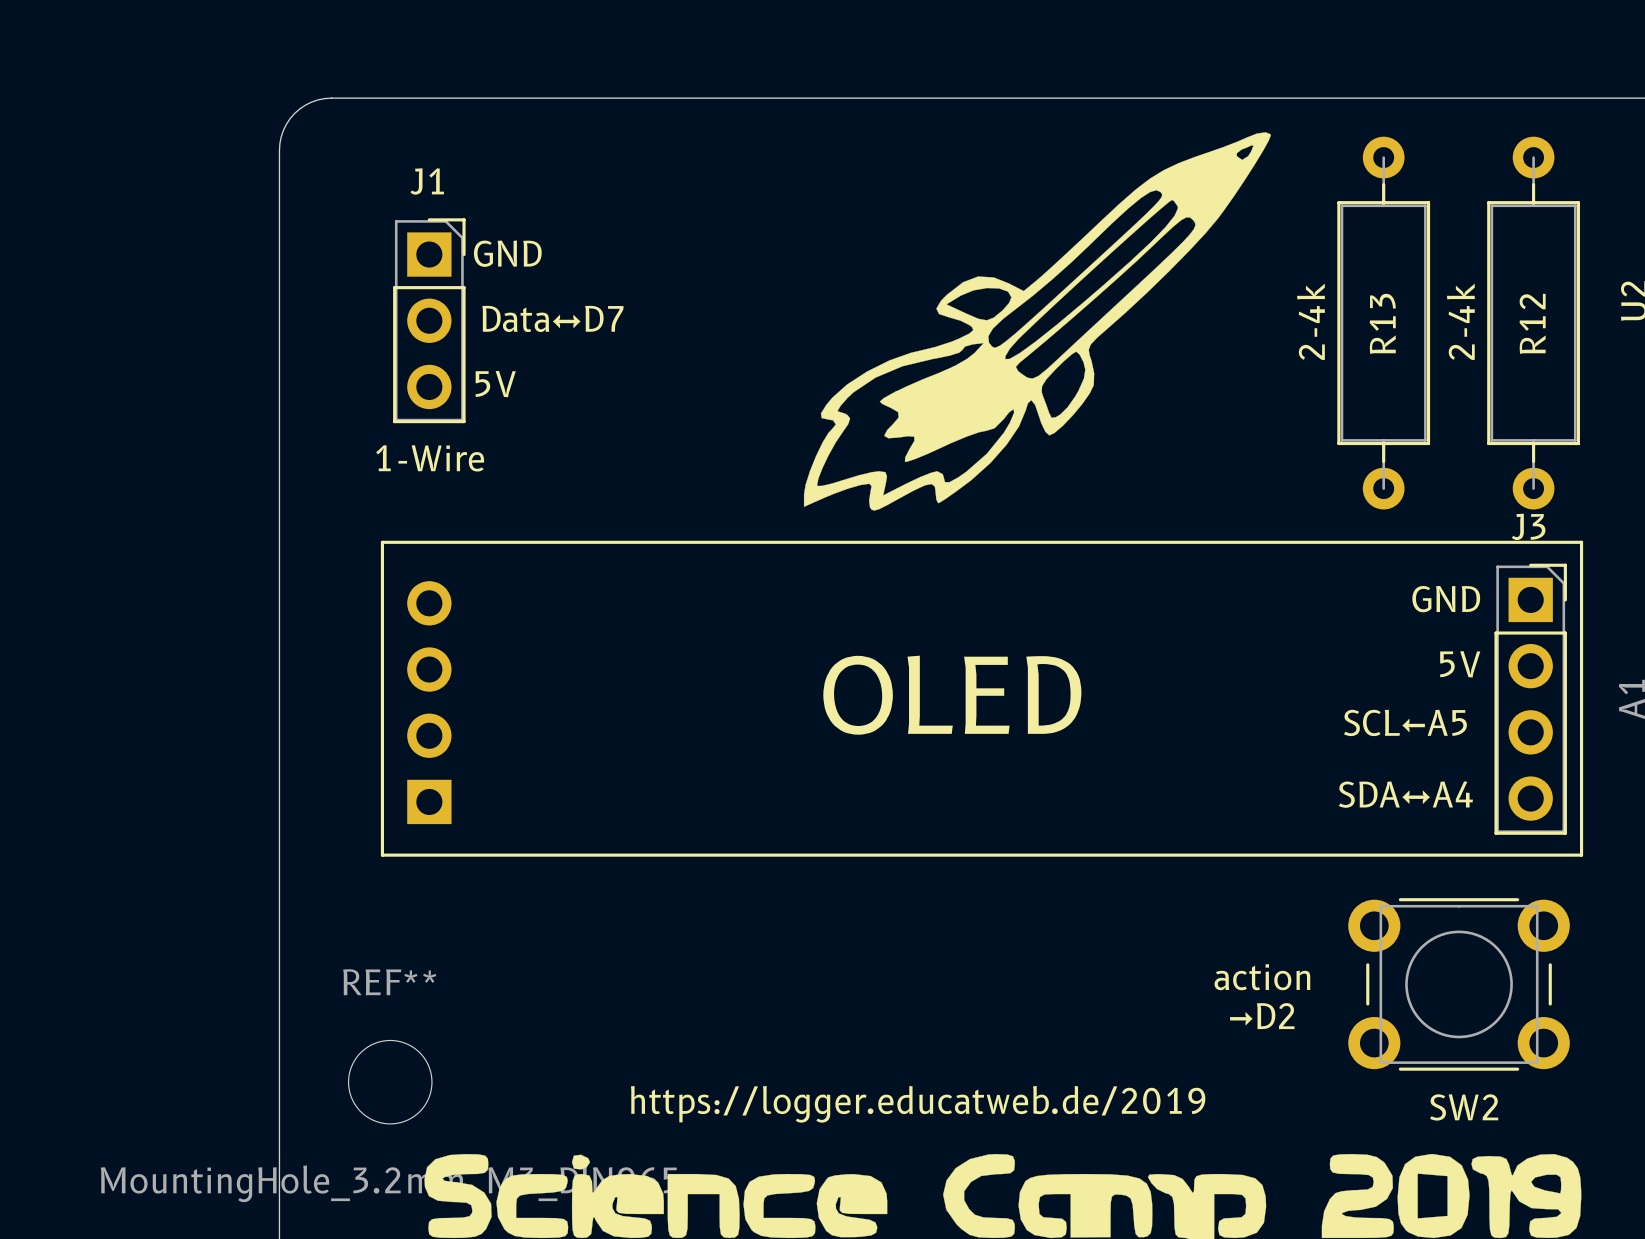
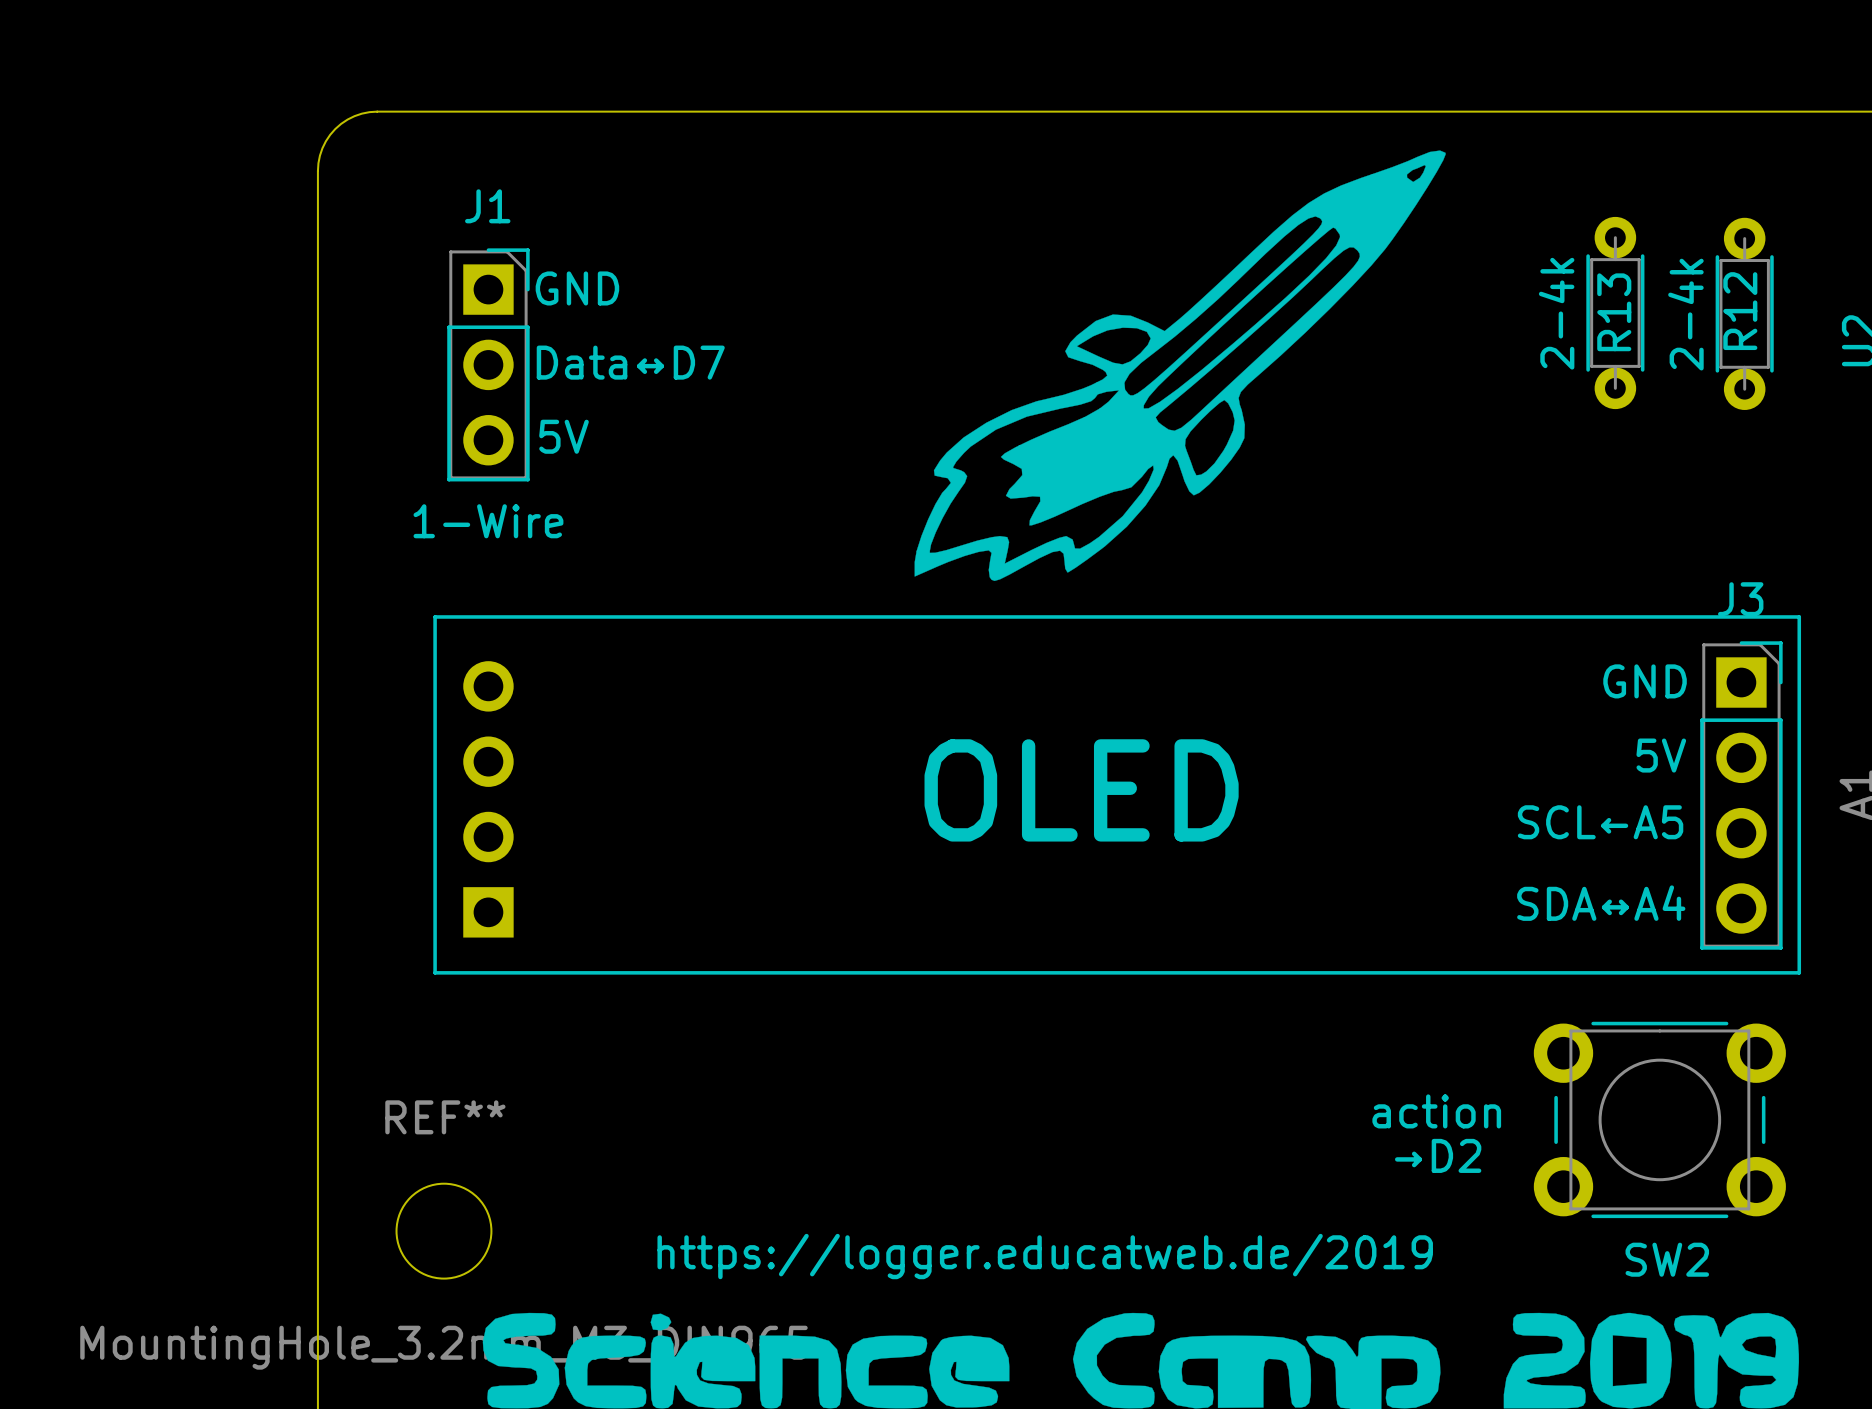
R13 footprint: [1337, 136, 1431, 510] -> [1586, 216, 1645, 410]
R12 footprint: [1487, 136, 1580, 510] -> [1715, 217, 1774, 410]

